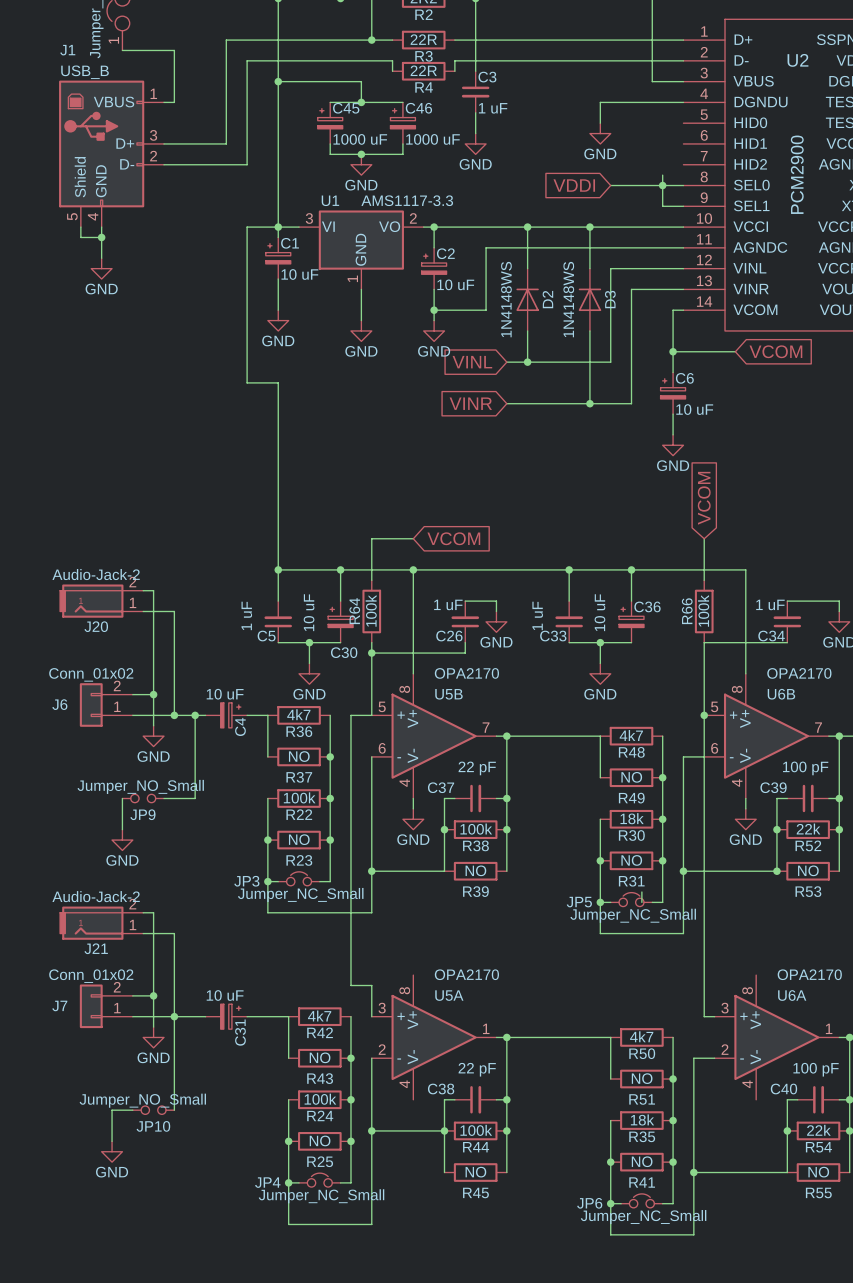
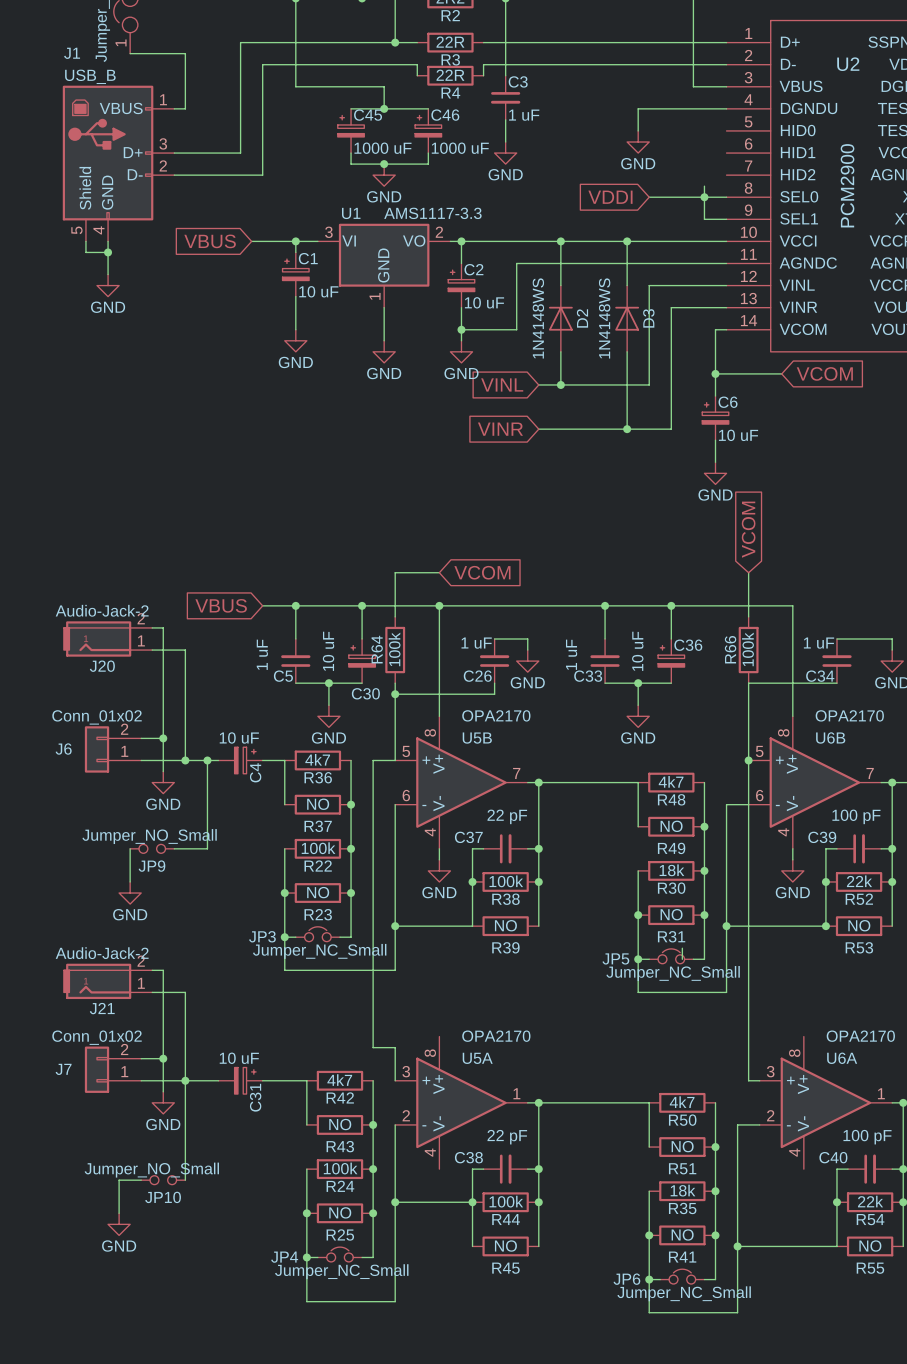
wire: (278, 81) (278, 227) -> none
junction: (278, 81) -> none
global label: none -> VBUS (210, 241)
wire: none -> (251, 241) (262, 241)
wire: (247, 227) (247, 382) (278, 382) (278, 569) -> (262, 605) (295, 605)
global label: none -> VBUS (221, 605)

